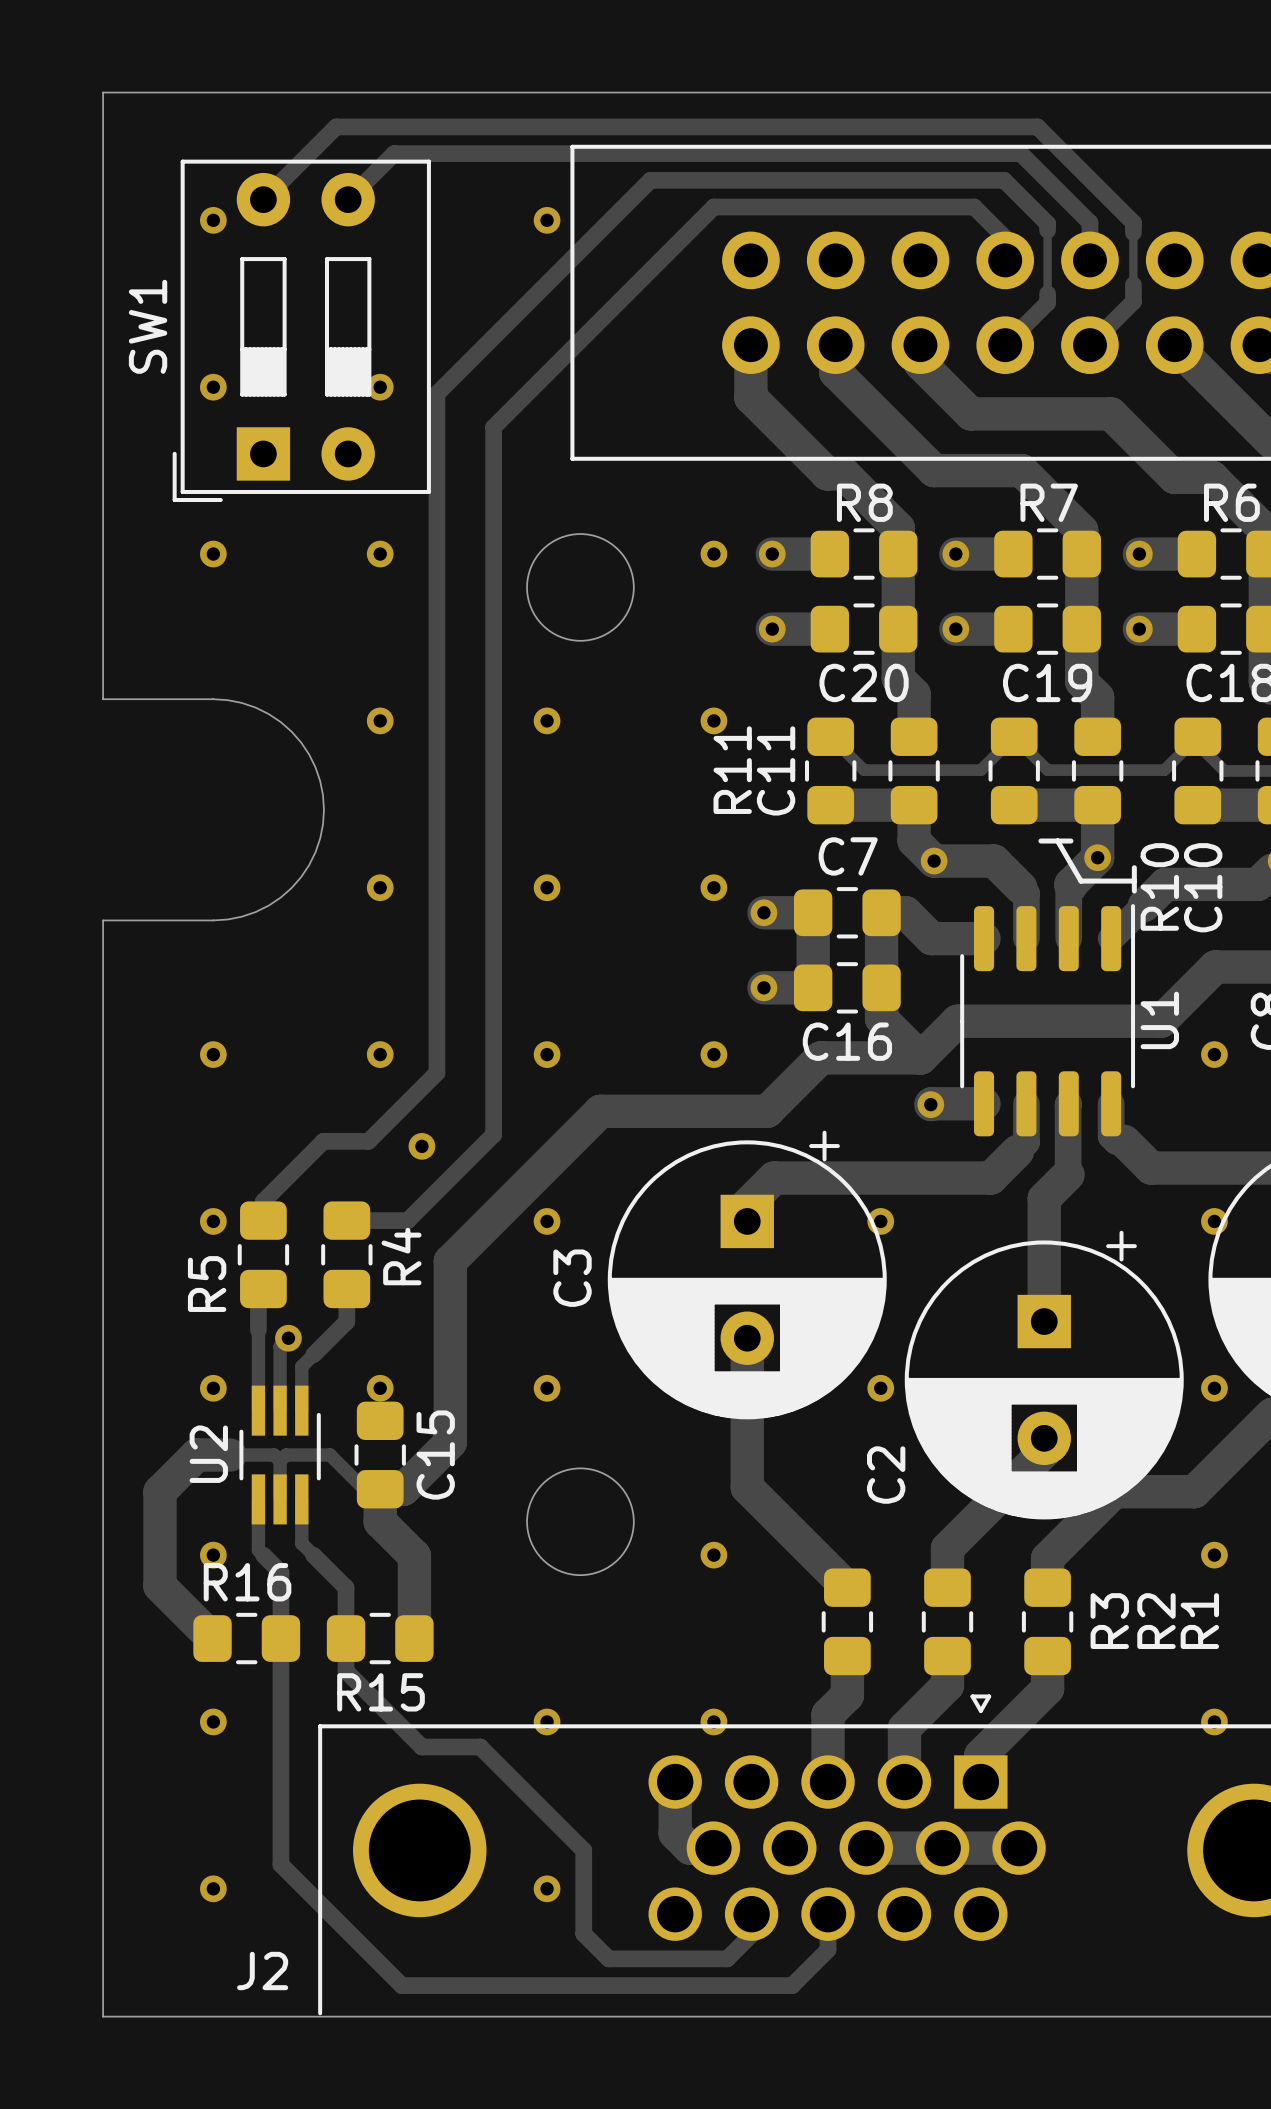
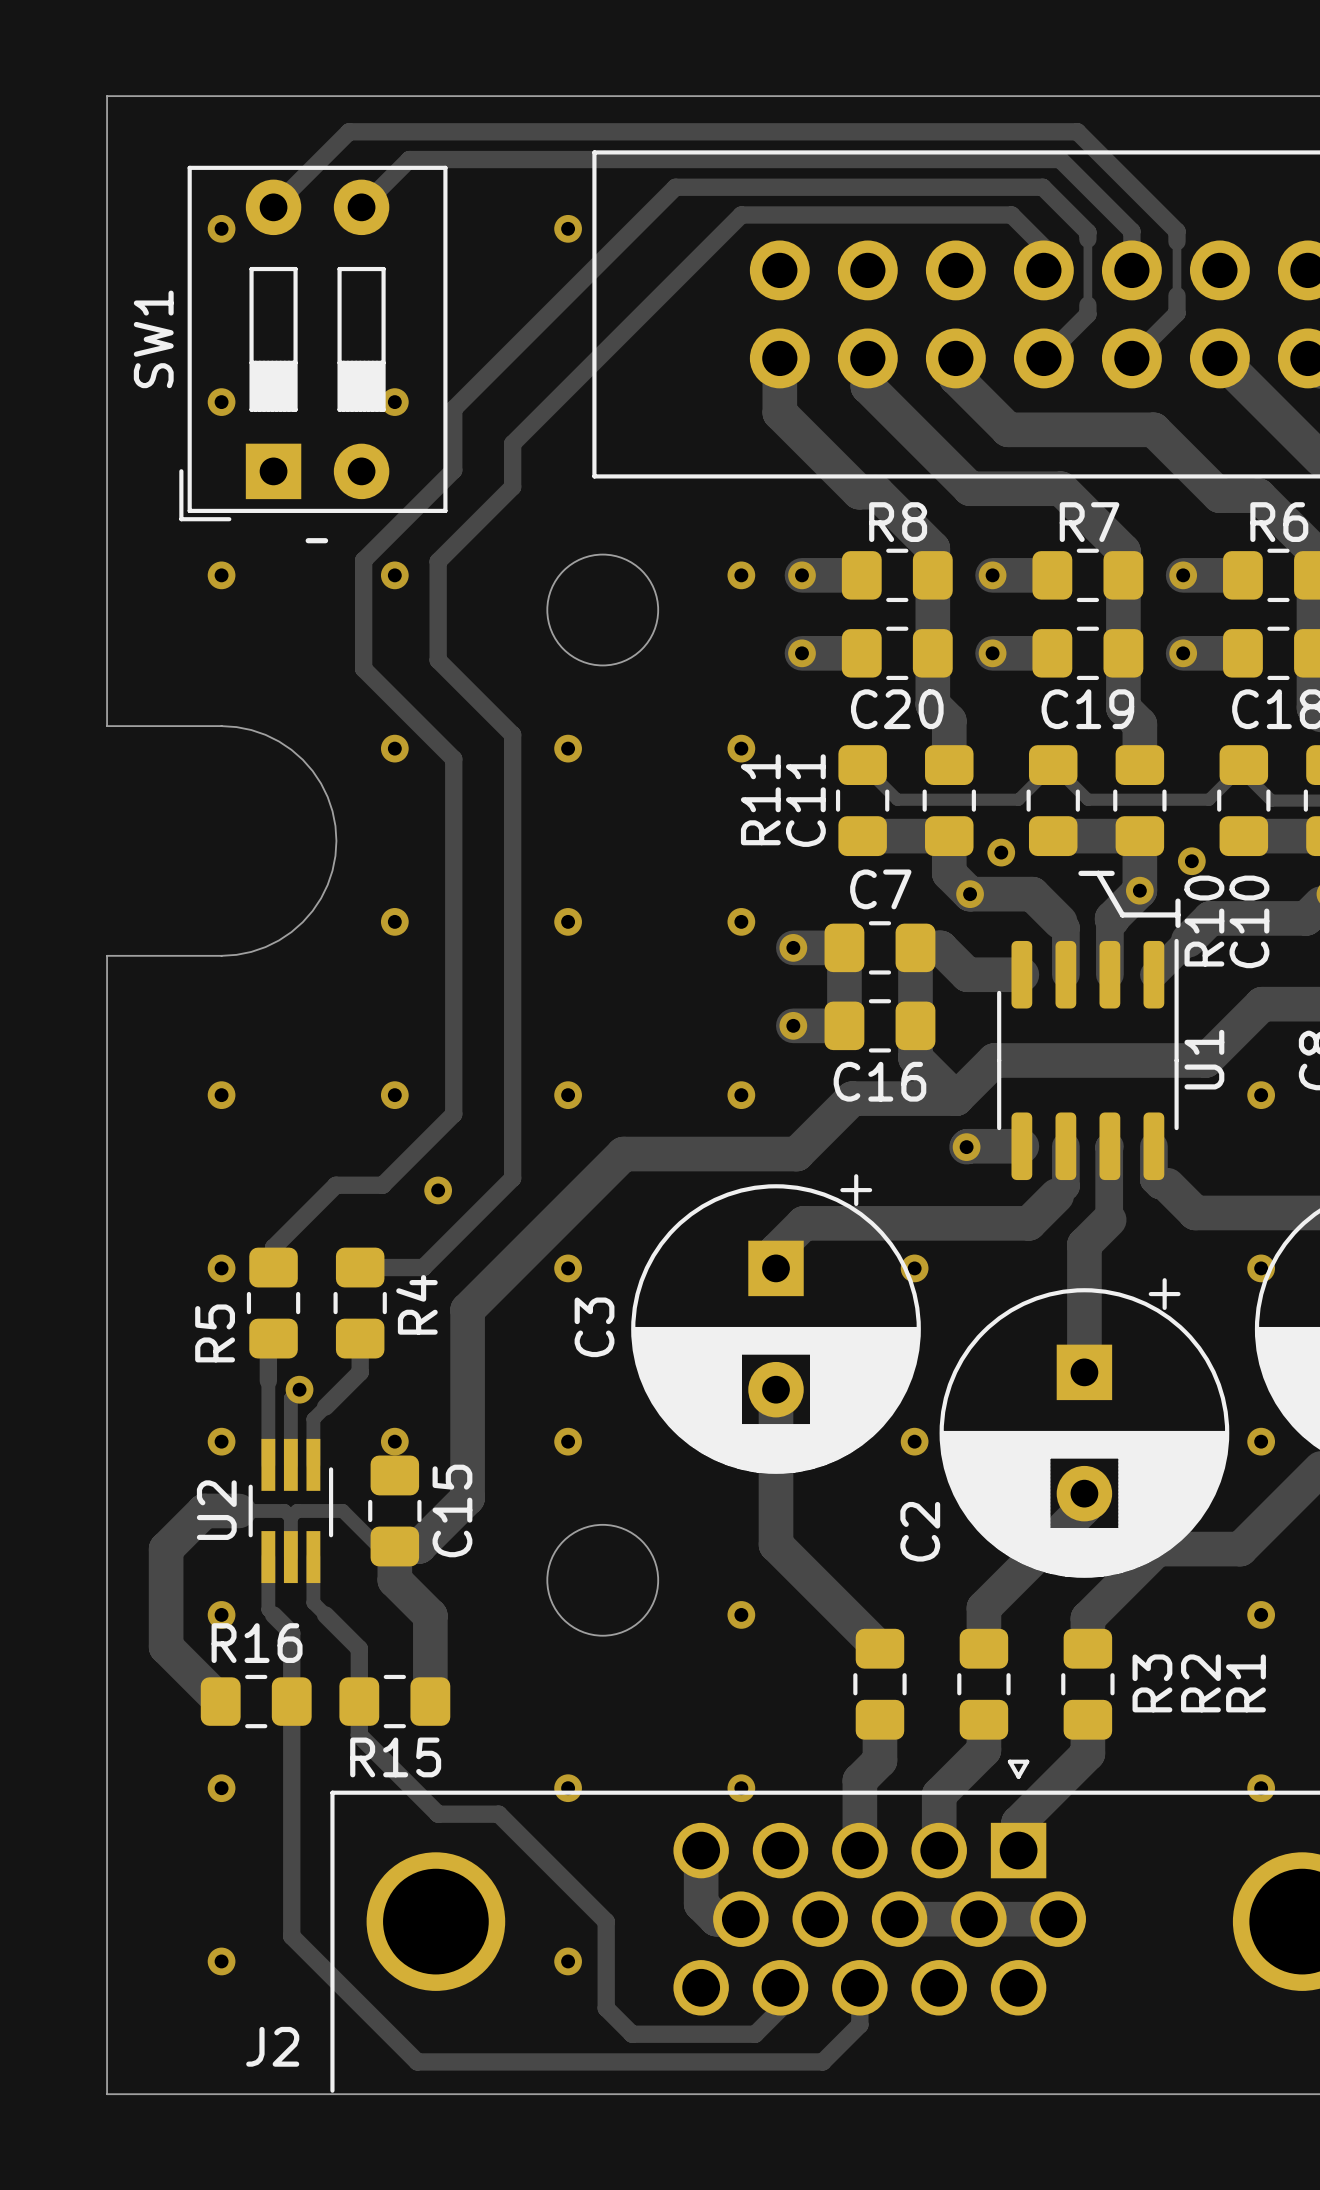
track: (436, 452) (436, 730) -> (453, 470) (363, 560) (363, 668) (453, 759)
track: (493, 468) (493, 707) -> (512, 486) (438, 561) (438, 660) (512, 734)
line: none -> (308, 540) (325, 540)
via: none -> (1001, 852)
via: none -> (1191, 861)

